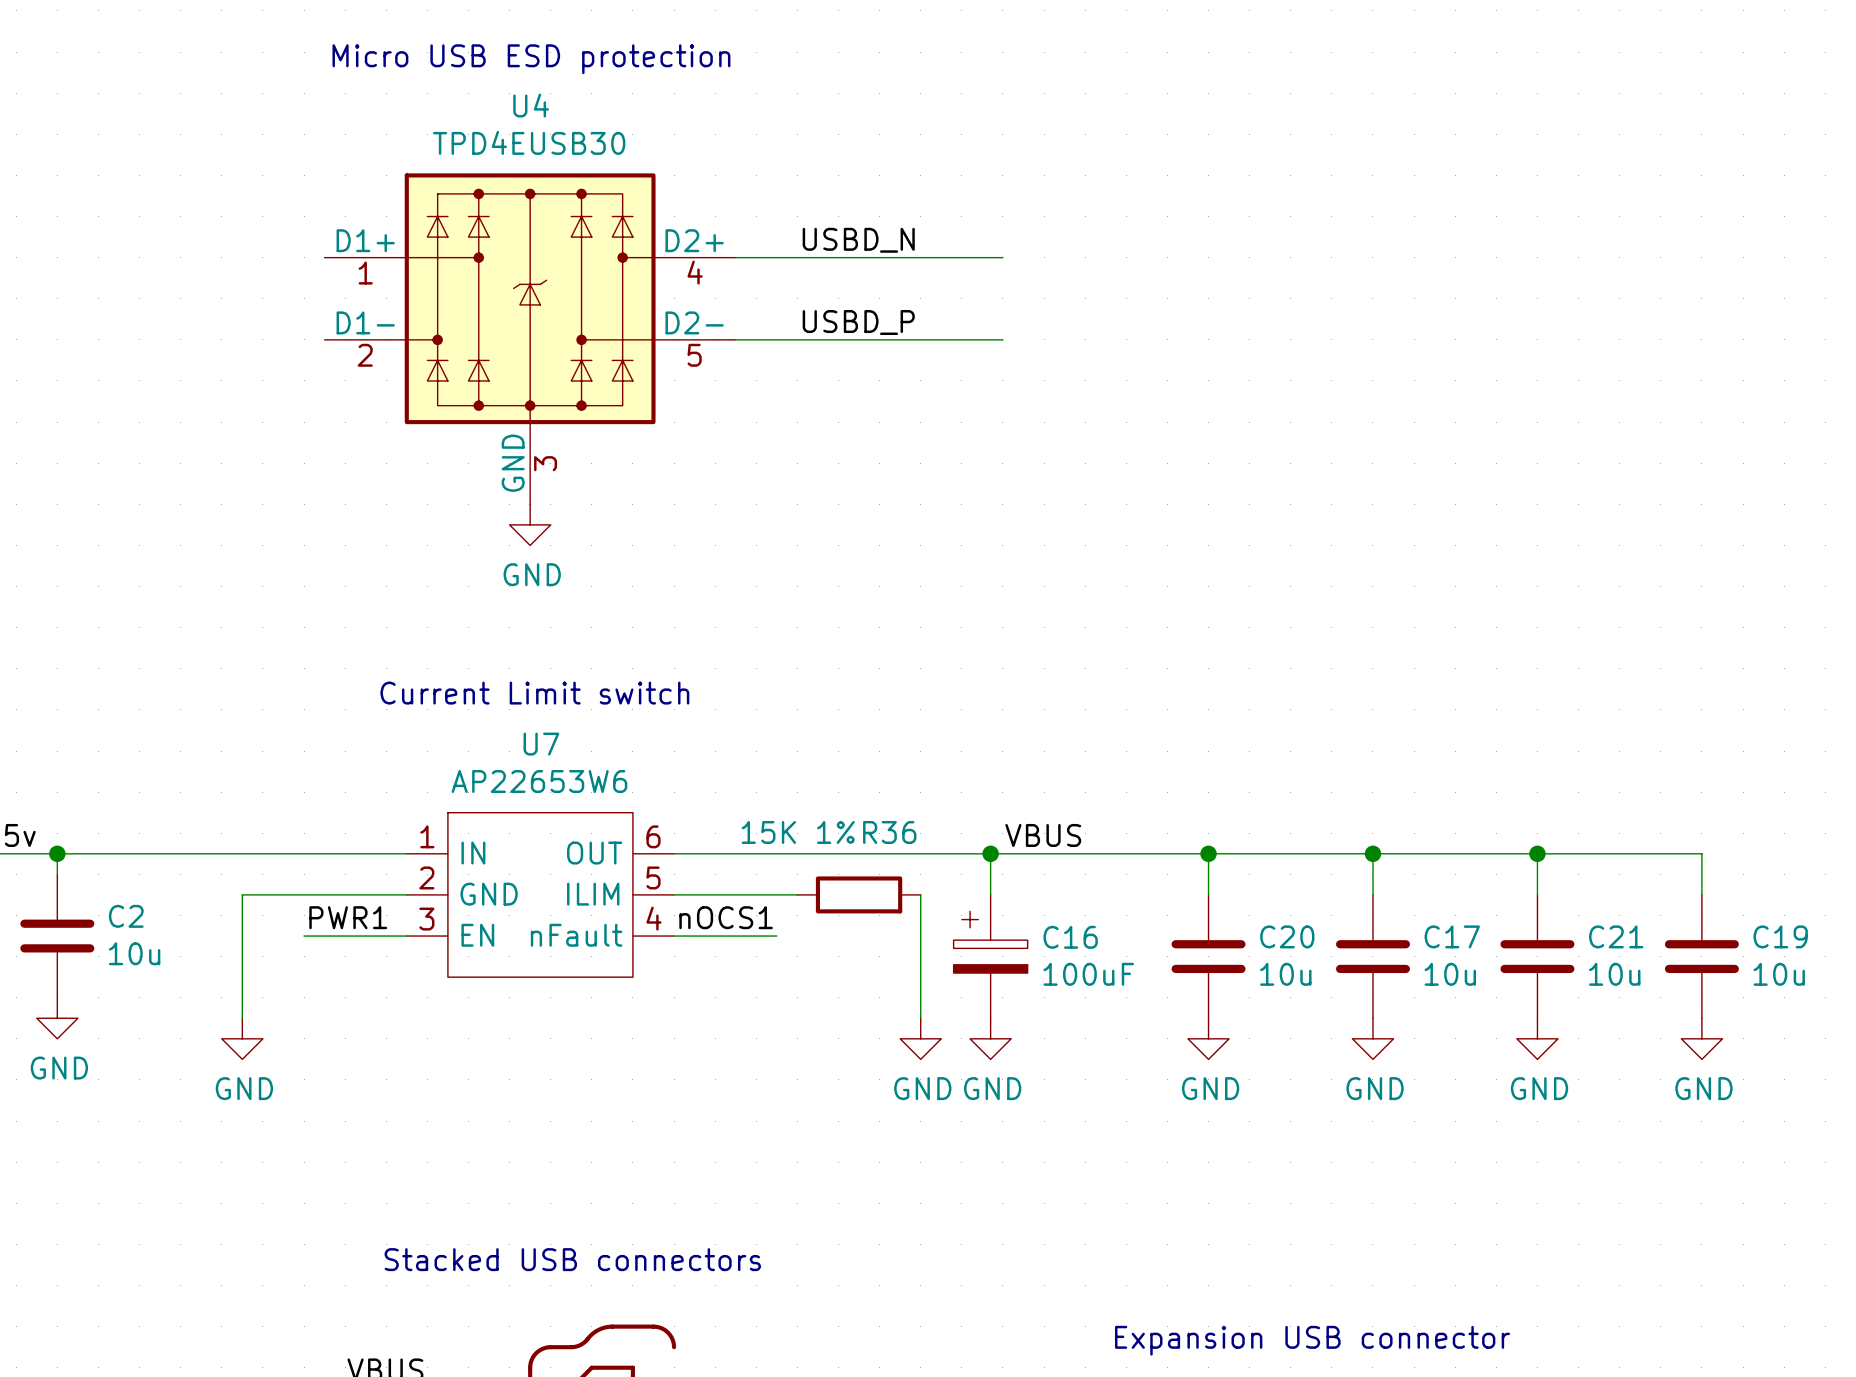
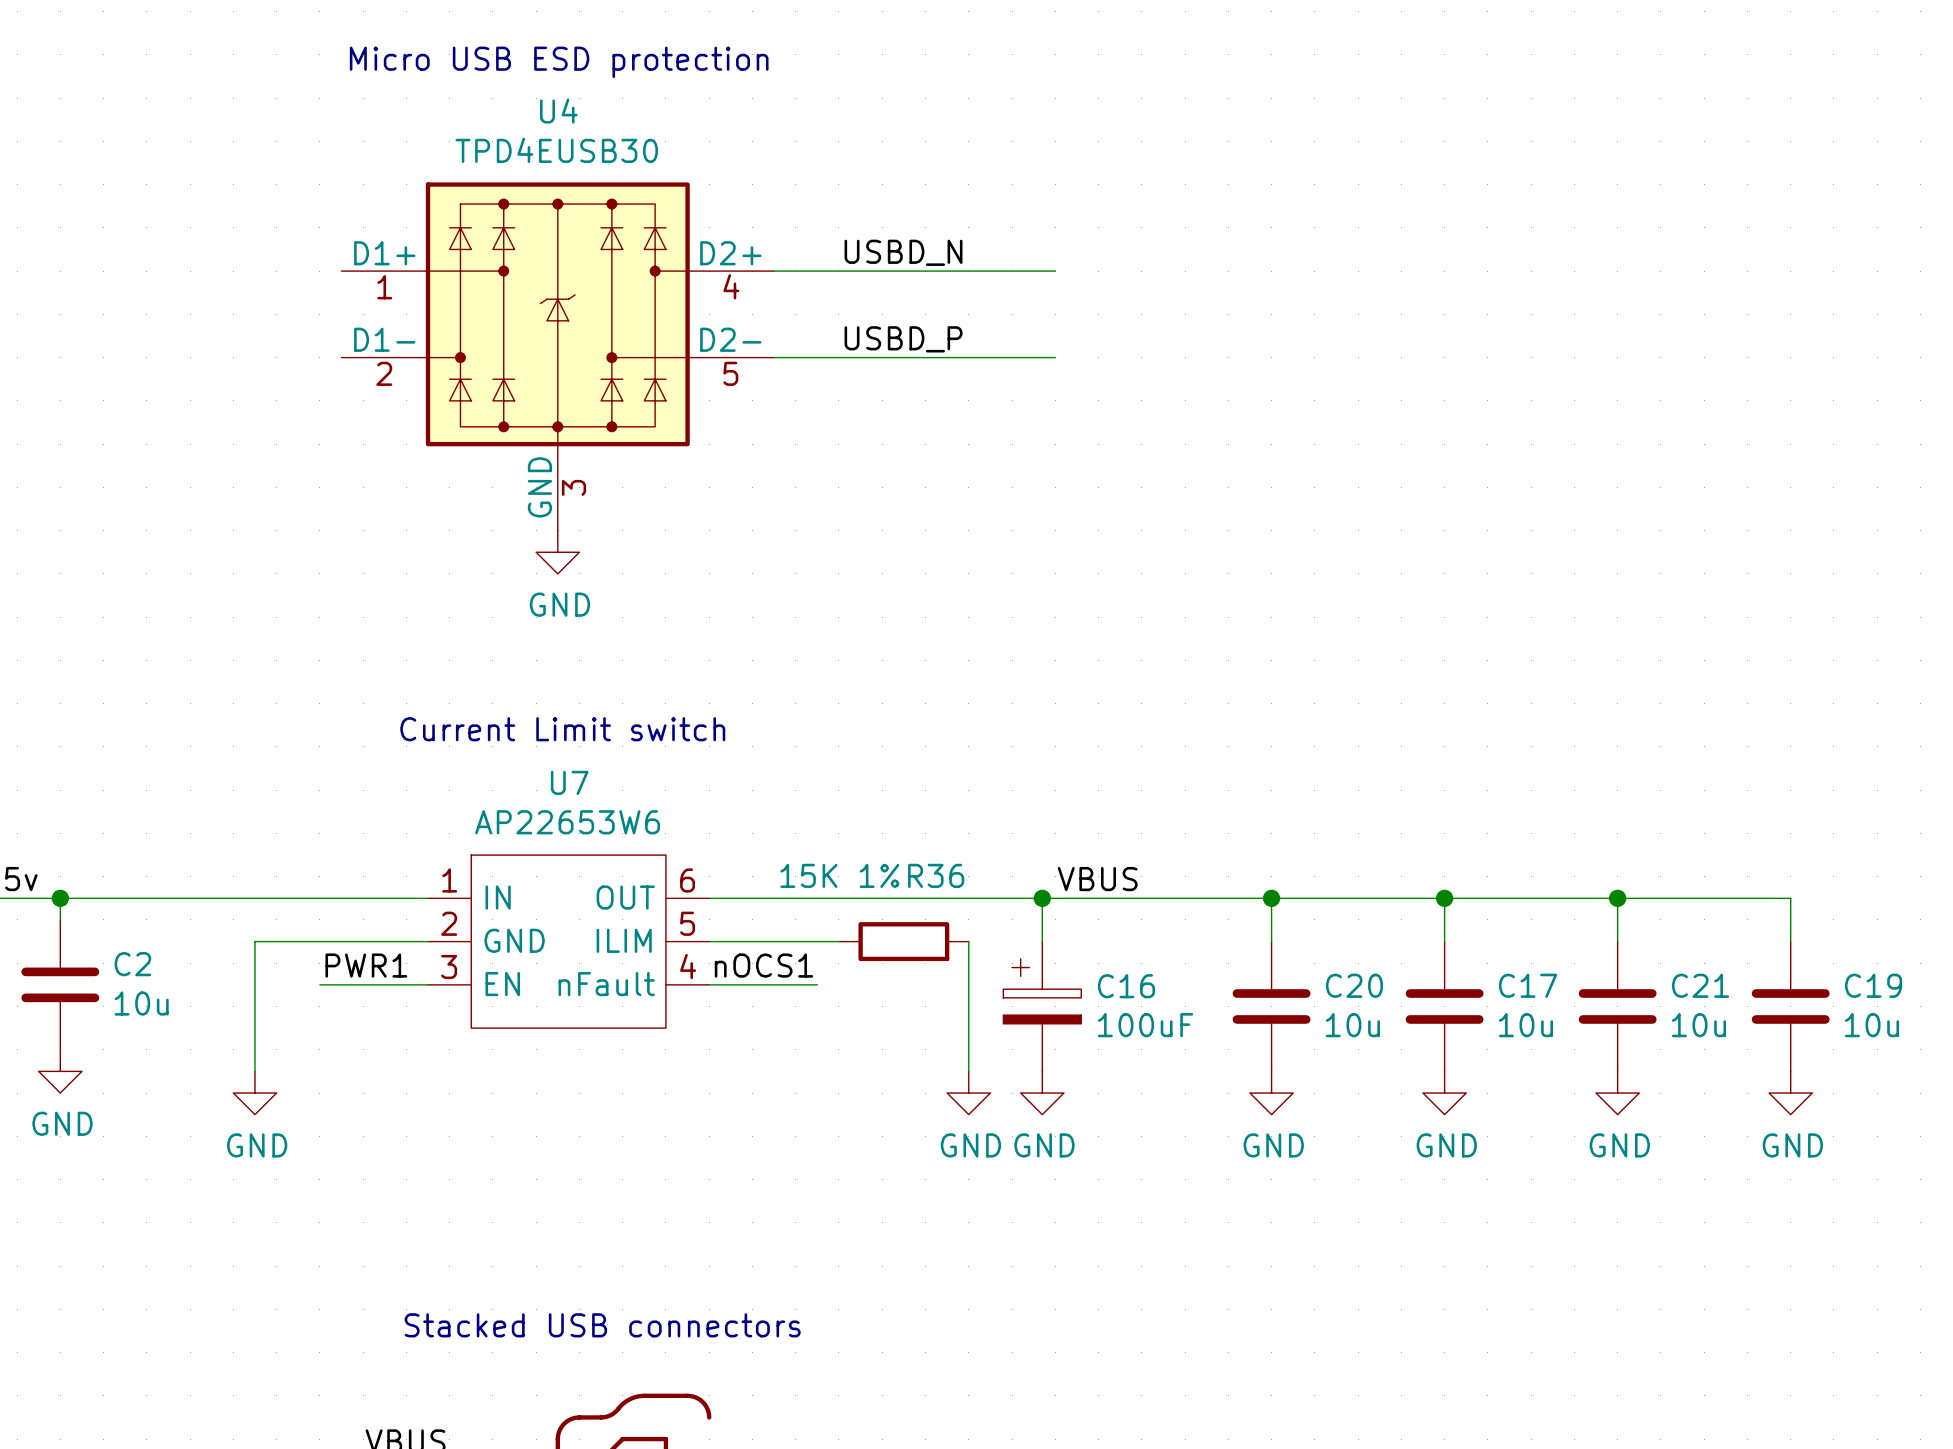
text: Expansion USB connector (1312, 1340) -> none

